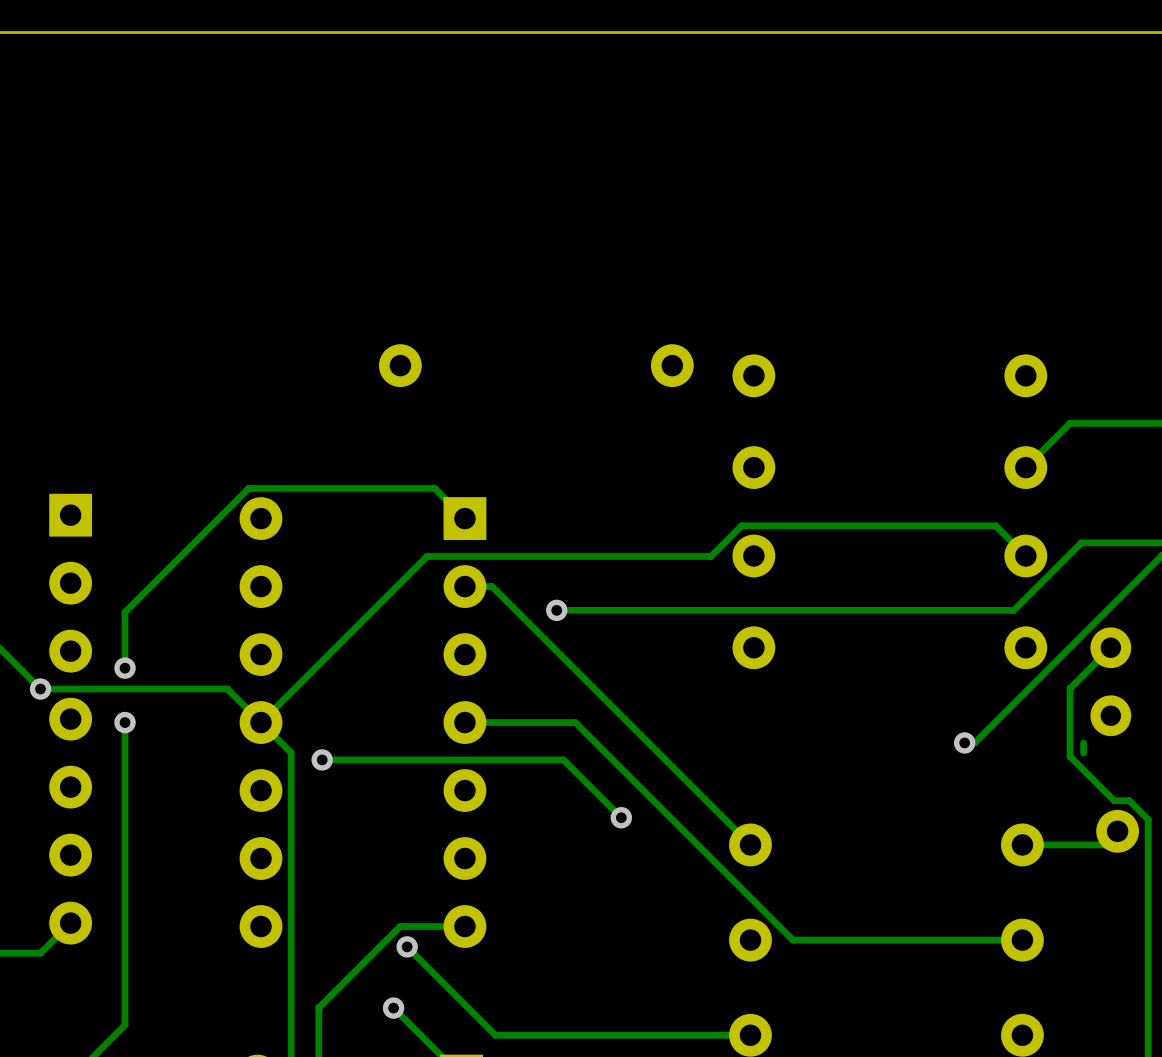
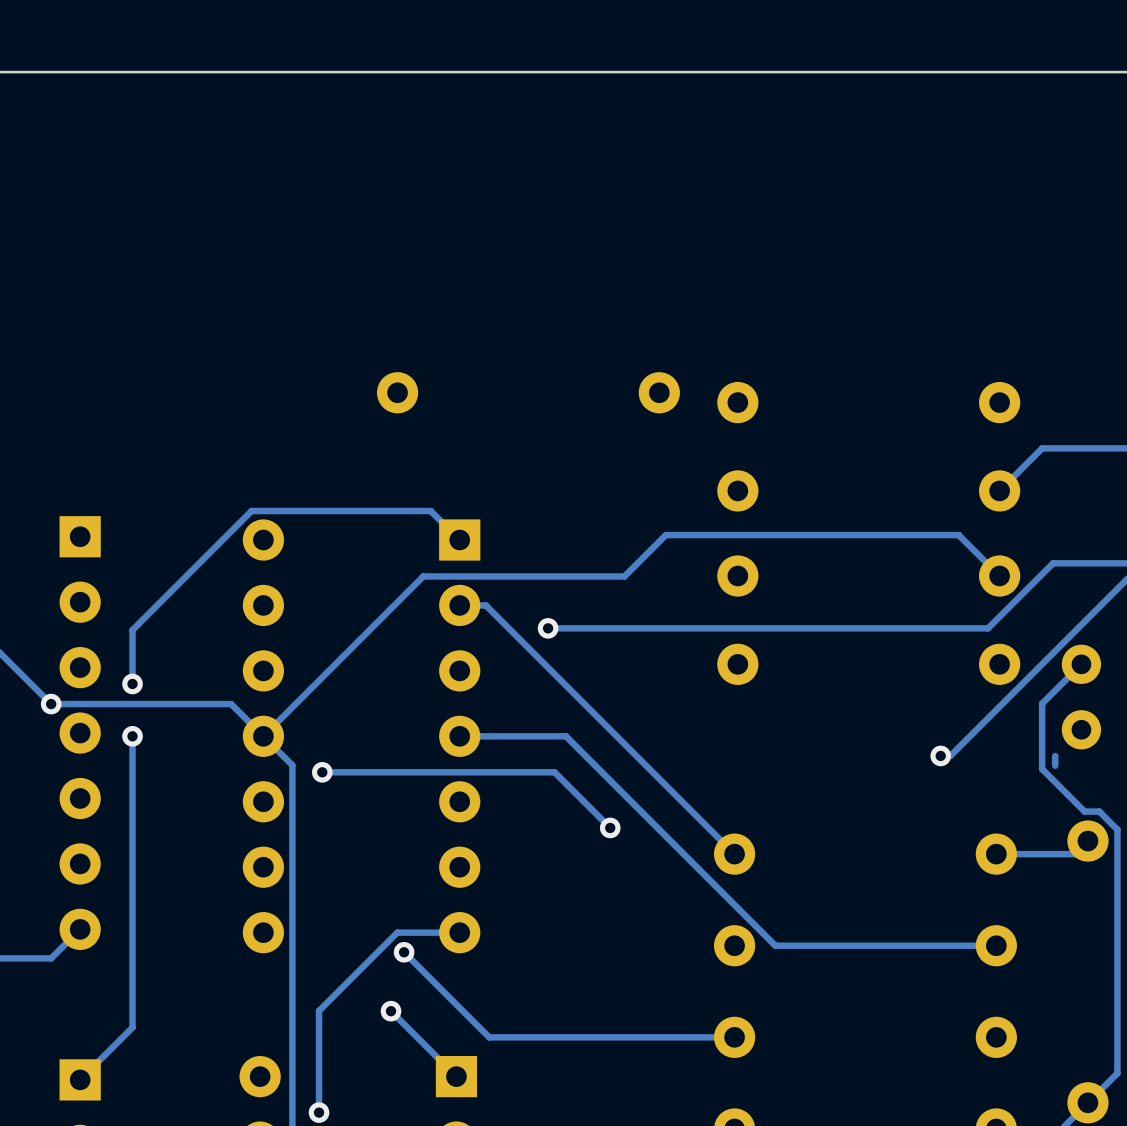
track: (995, 525) (741, 525) (711, 556) (636, 556) -> (970, 547) (958, 535) (665, 535) (624, 576)

